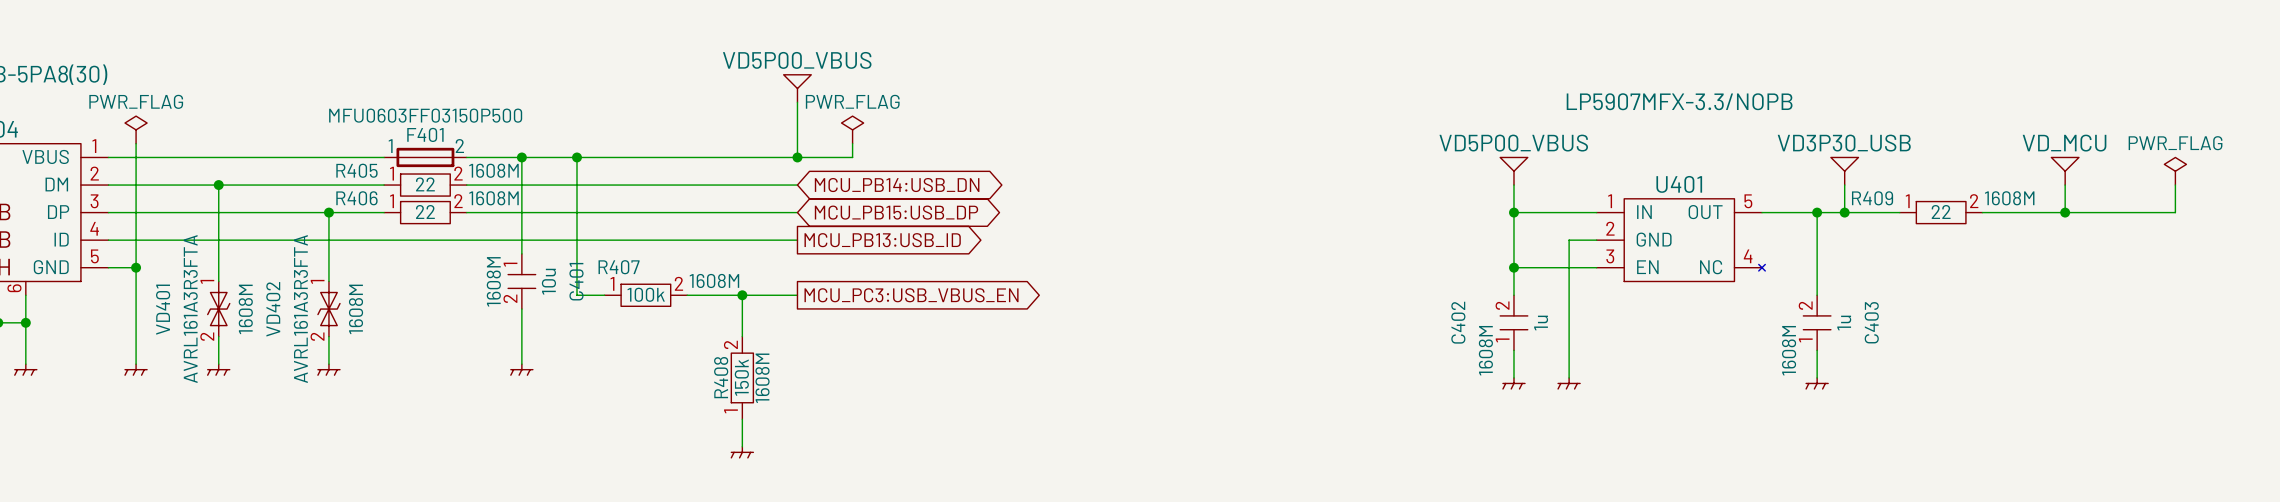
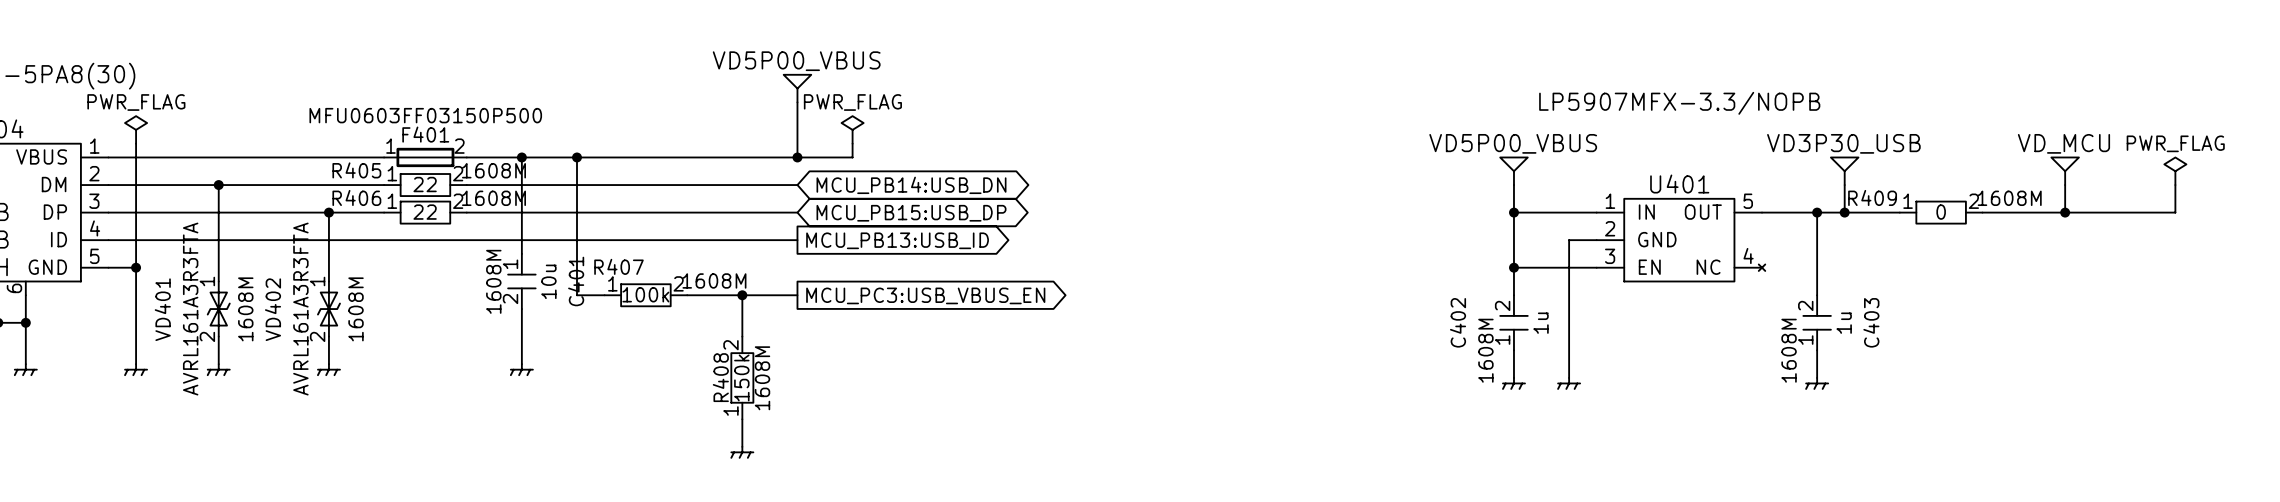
R409 value: 22 (1941, 212) -> 0 (1941, 212)

